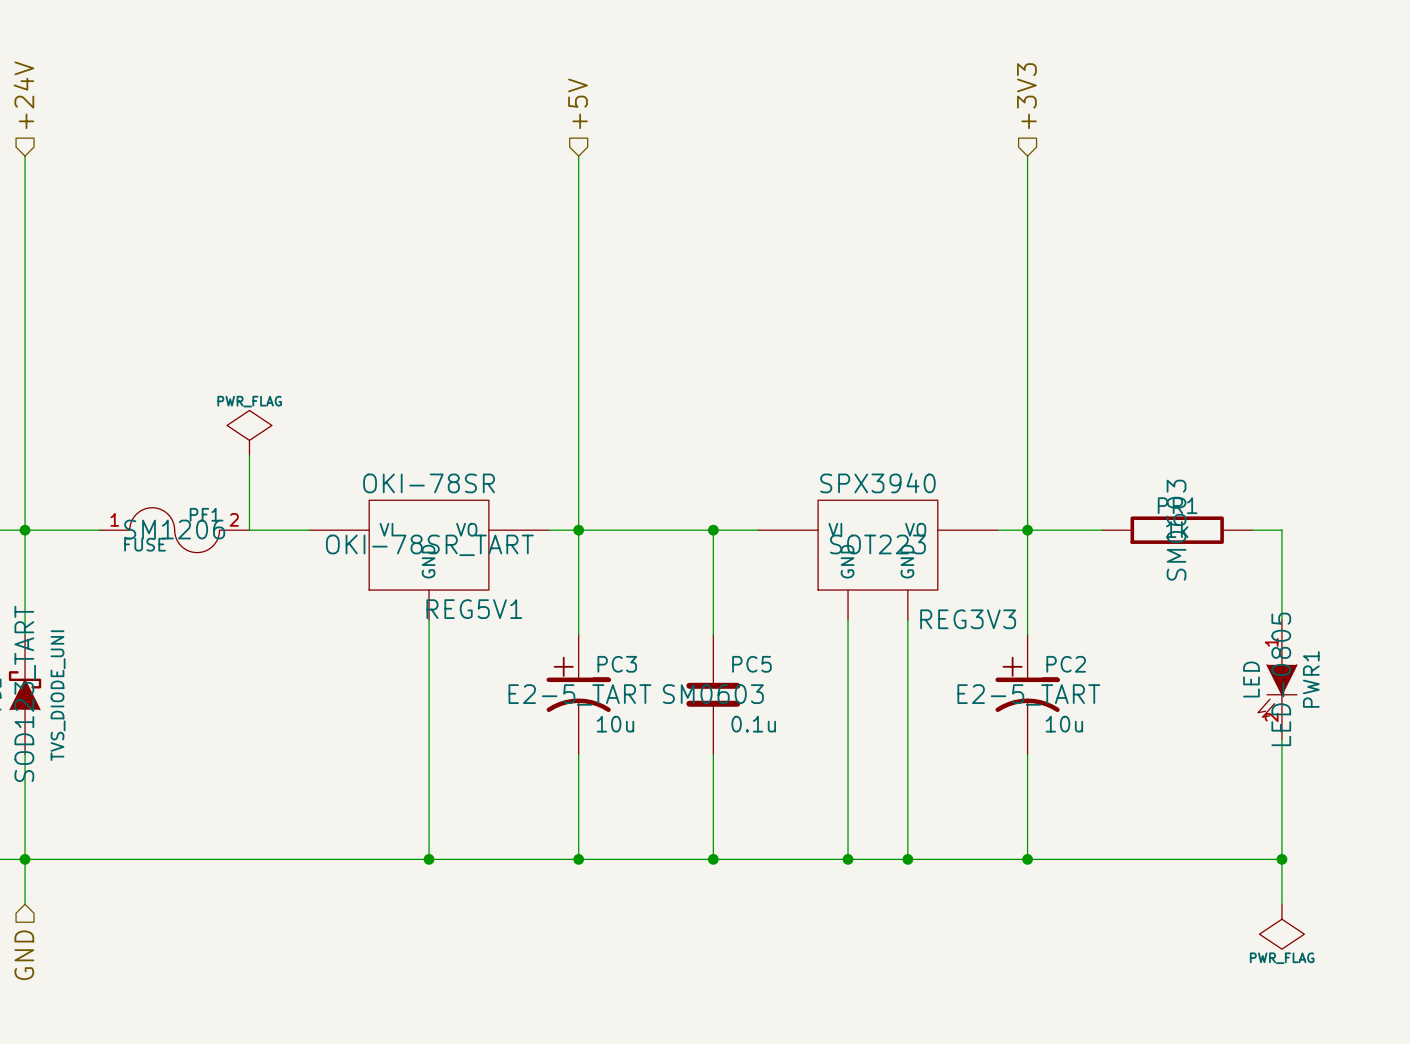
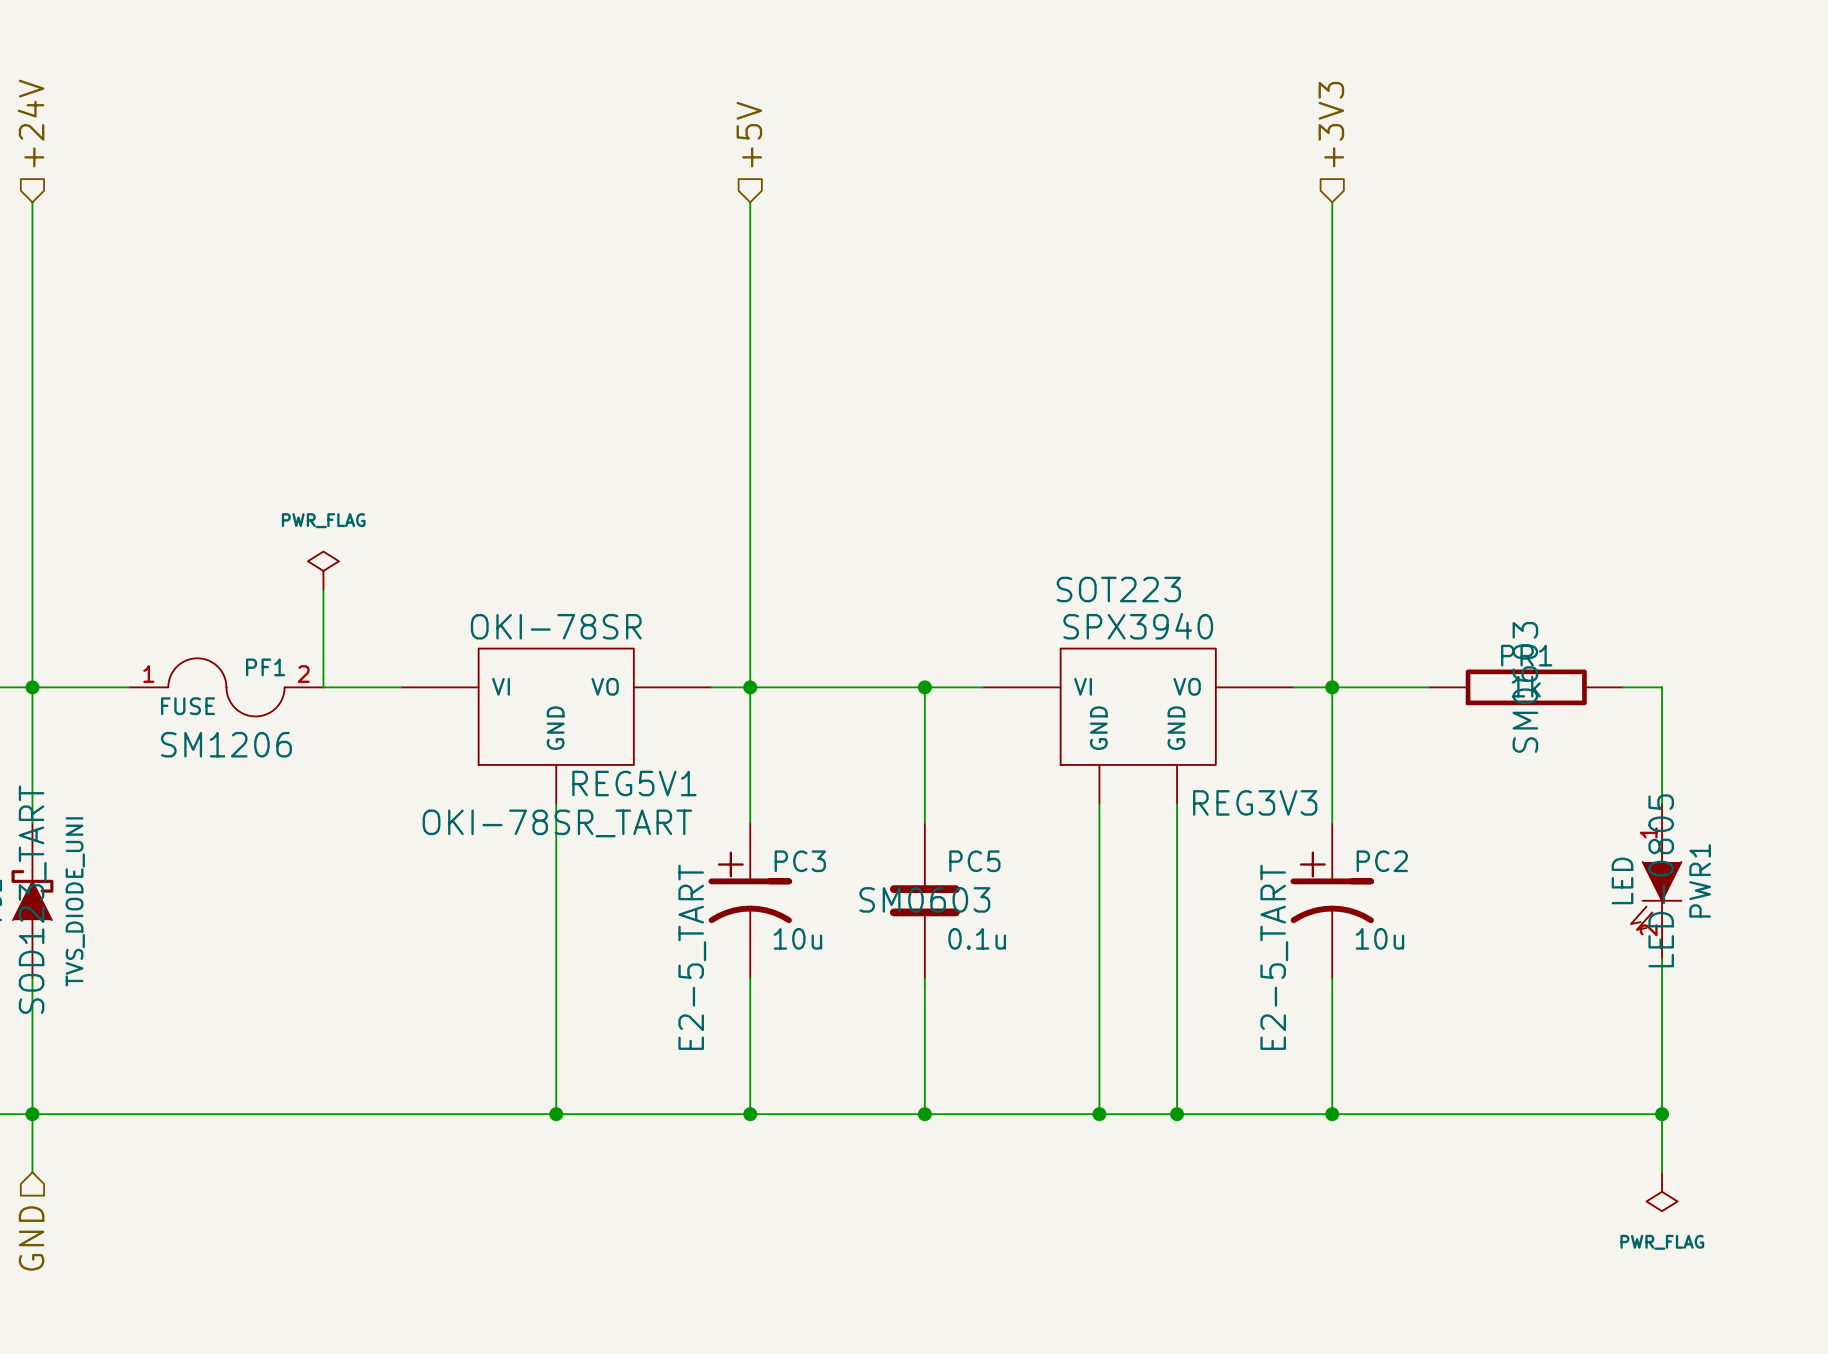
power symbol shape: [227, 410, 272, 456] -> [307, 551, 339, 591]
PF1 text position: SM1206 (174, 529) -> SM1206 (226, 744)
REG3V3 text position: SOT223 (877, 544) -> SOT223 (1118, 589)
REG5V1 text position: OKI-78SR_TART (429, 545) -> OKI-78SR_TART (557, 823)
REG5V1 name position: REG5V1 (474, 609) -> REG5V1 (634, 783)
PC3 text rotation: 0° (579, 694) -> 90° counterclockwise (692, 957)
PC2 text rotation: 0° (1028, 694) -> 90° counterclockwise (1274, 957)
power symbol shape: [1259, 904, 1305, 950] -> [1646, 1172, 1678, 1212]

